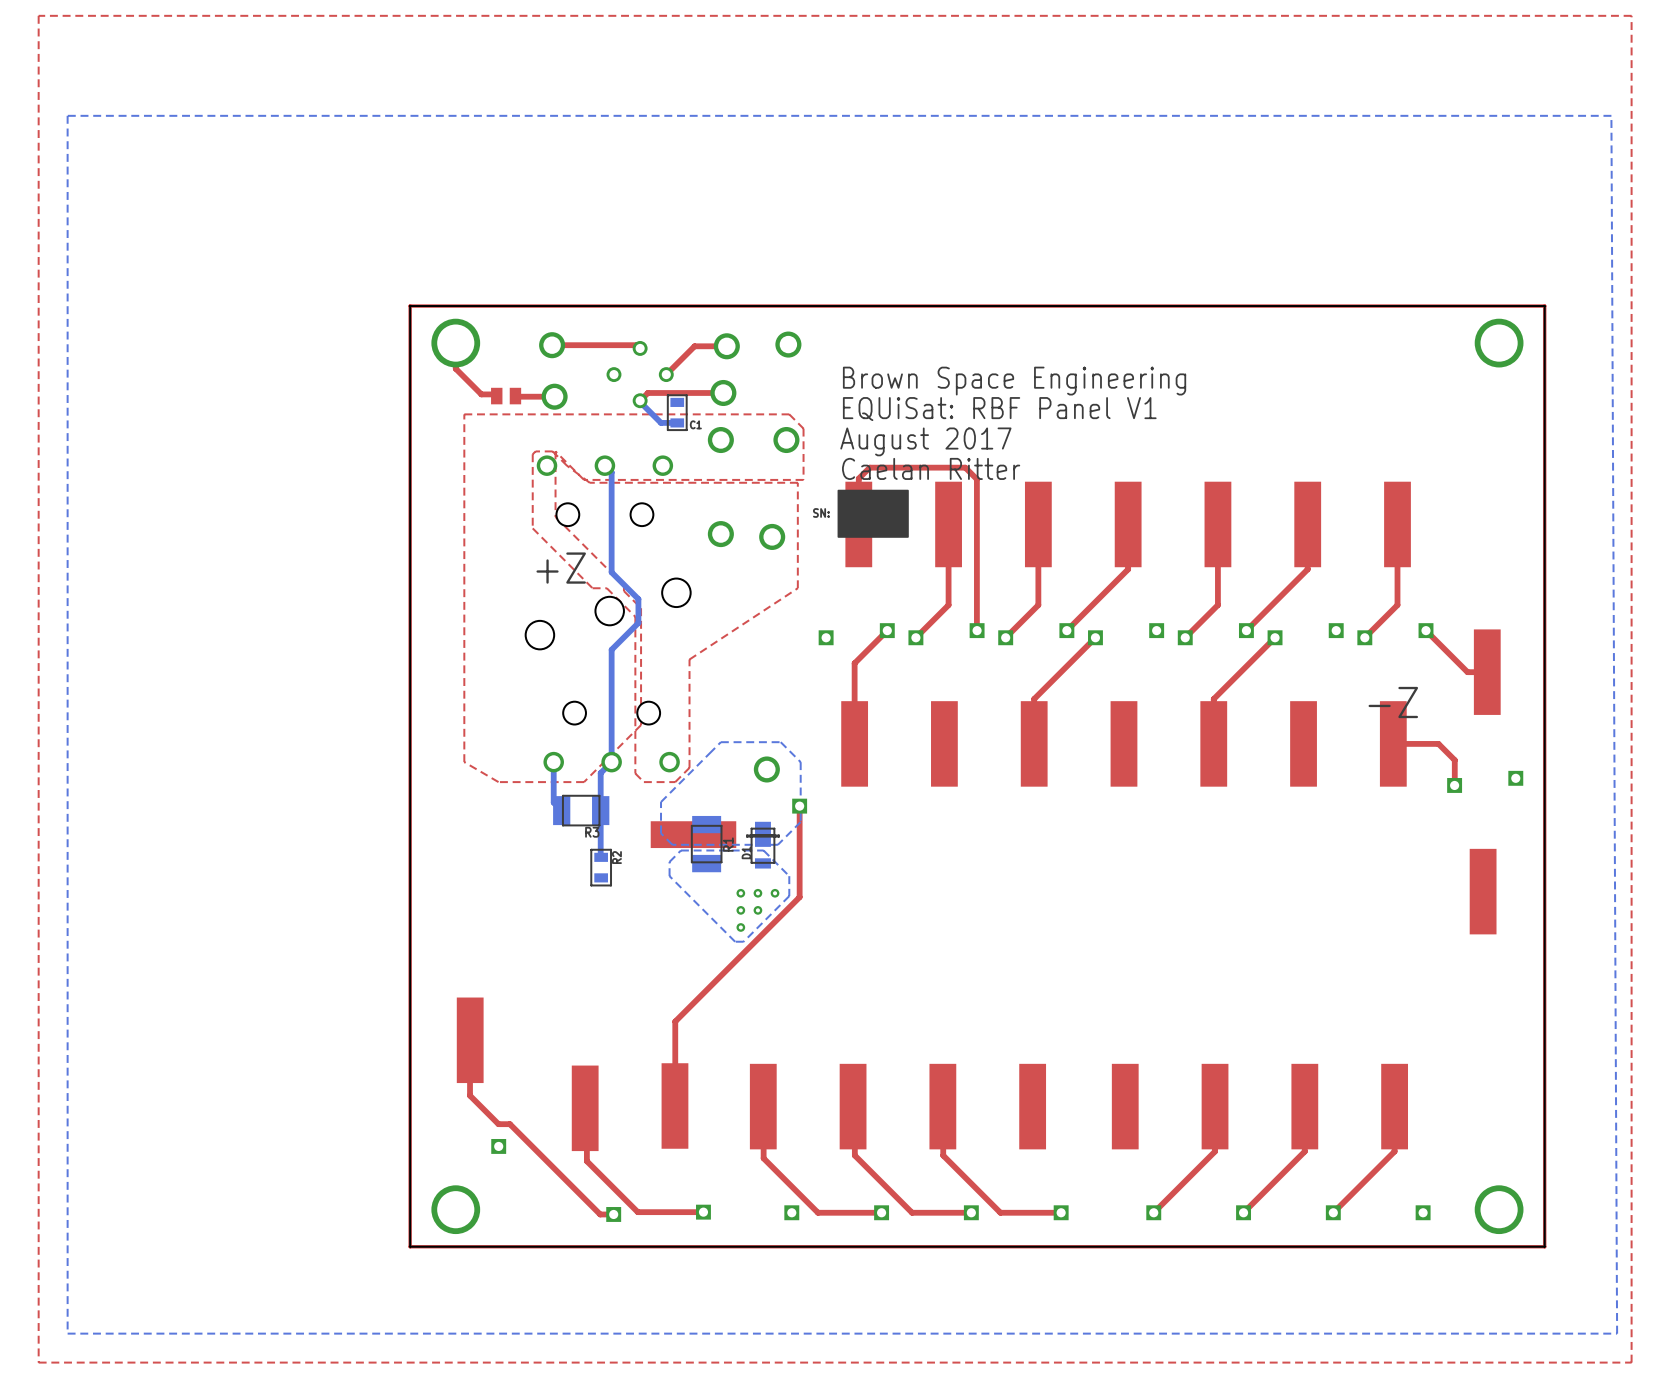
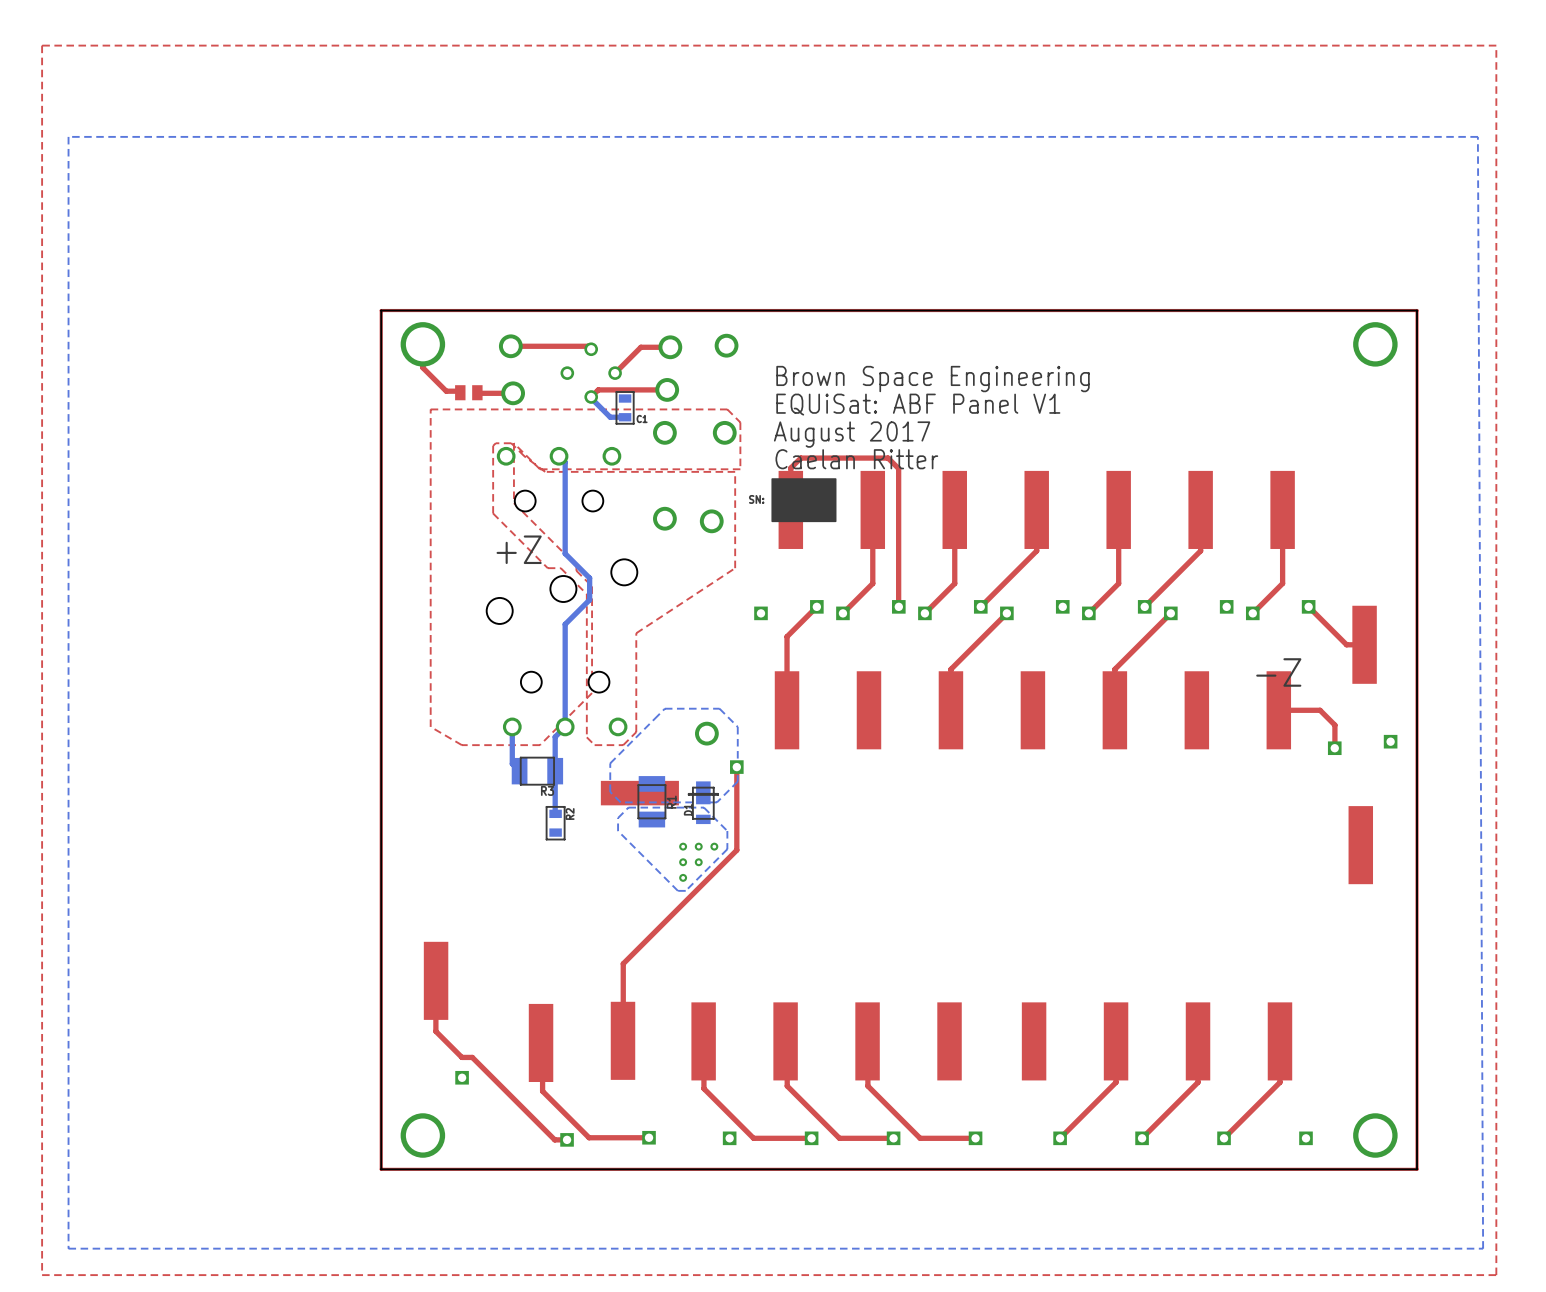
text: EQUiSat: RBF Panel V1 (999, 409) -> EQUiSat: ABF Panel V1 (918, 404)

